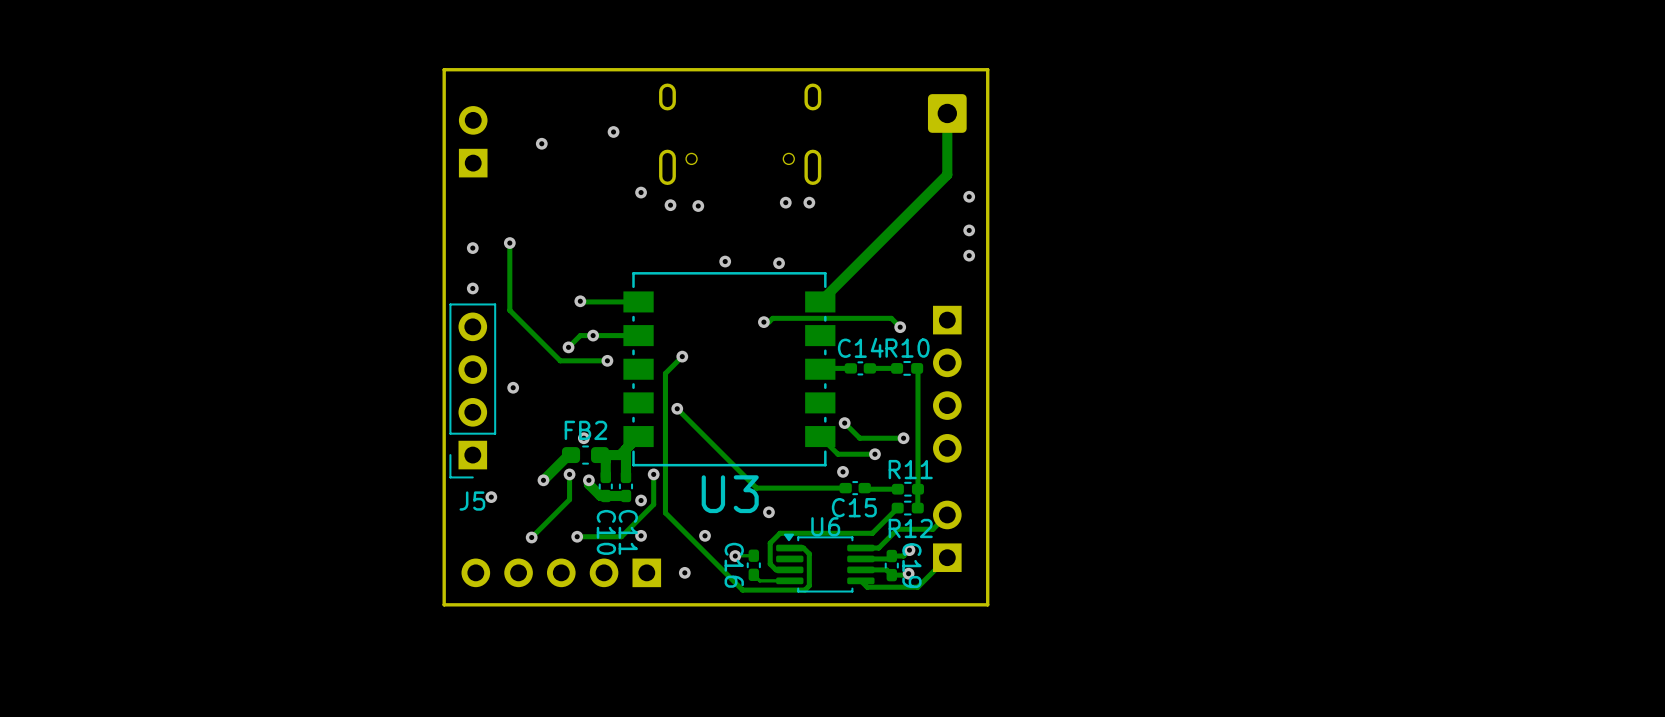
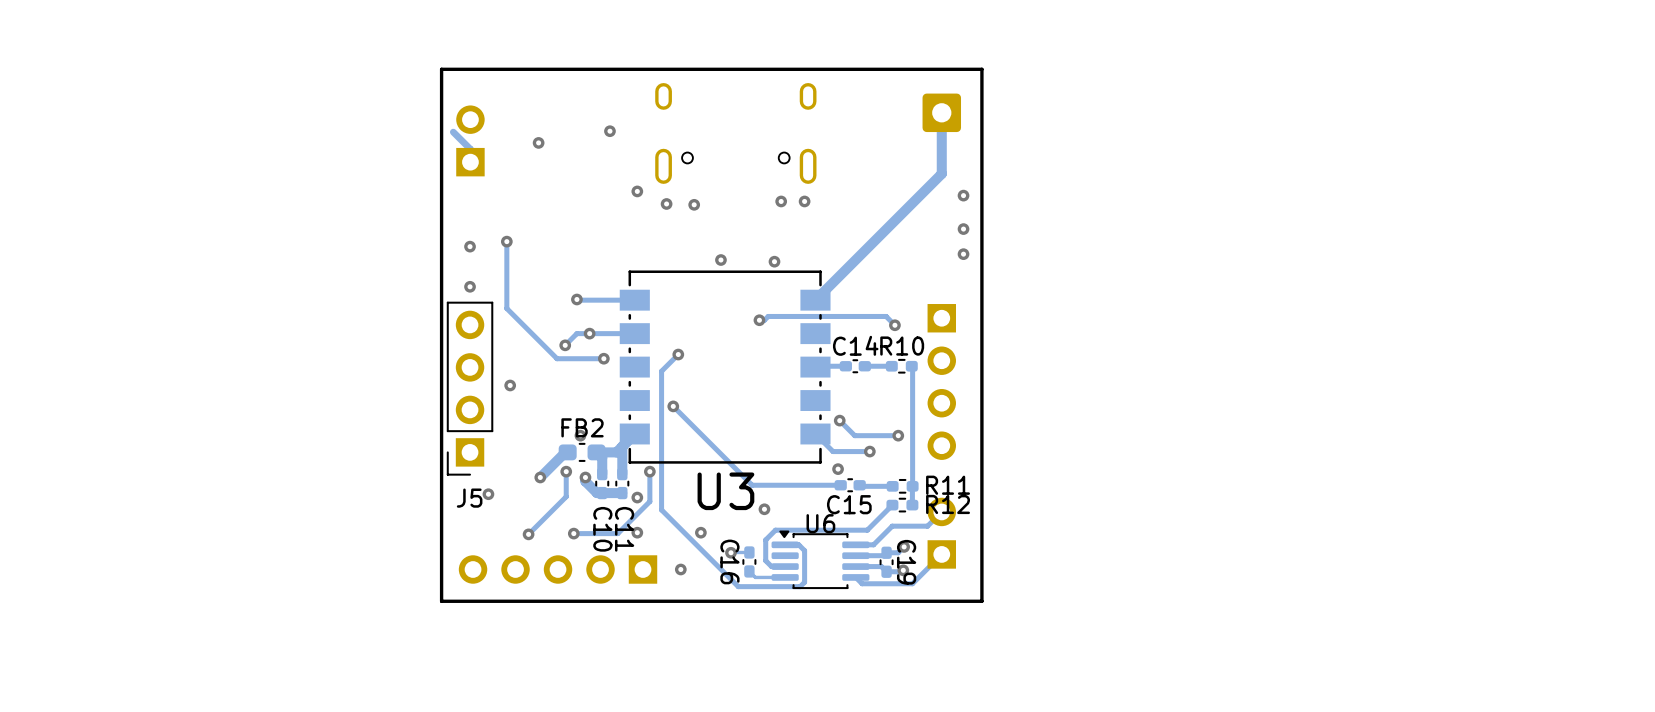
track: none -> (453, 132) (470, 149) (470, 162)
R11 name position: R11 (910, 469) -> R11 (948, 485)
R12 name position: R12 (910, 528) -> R12 (948, 504)

